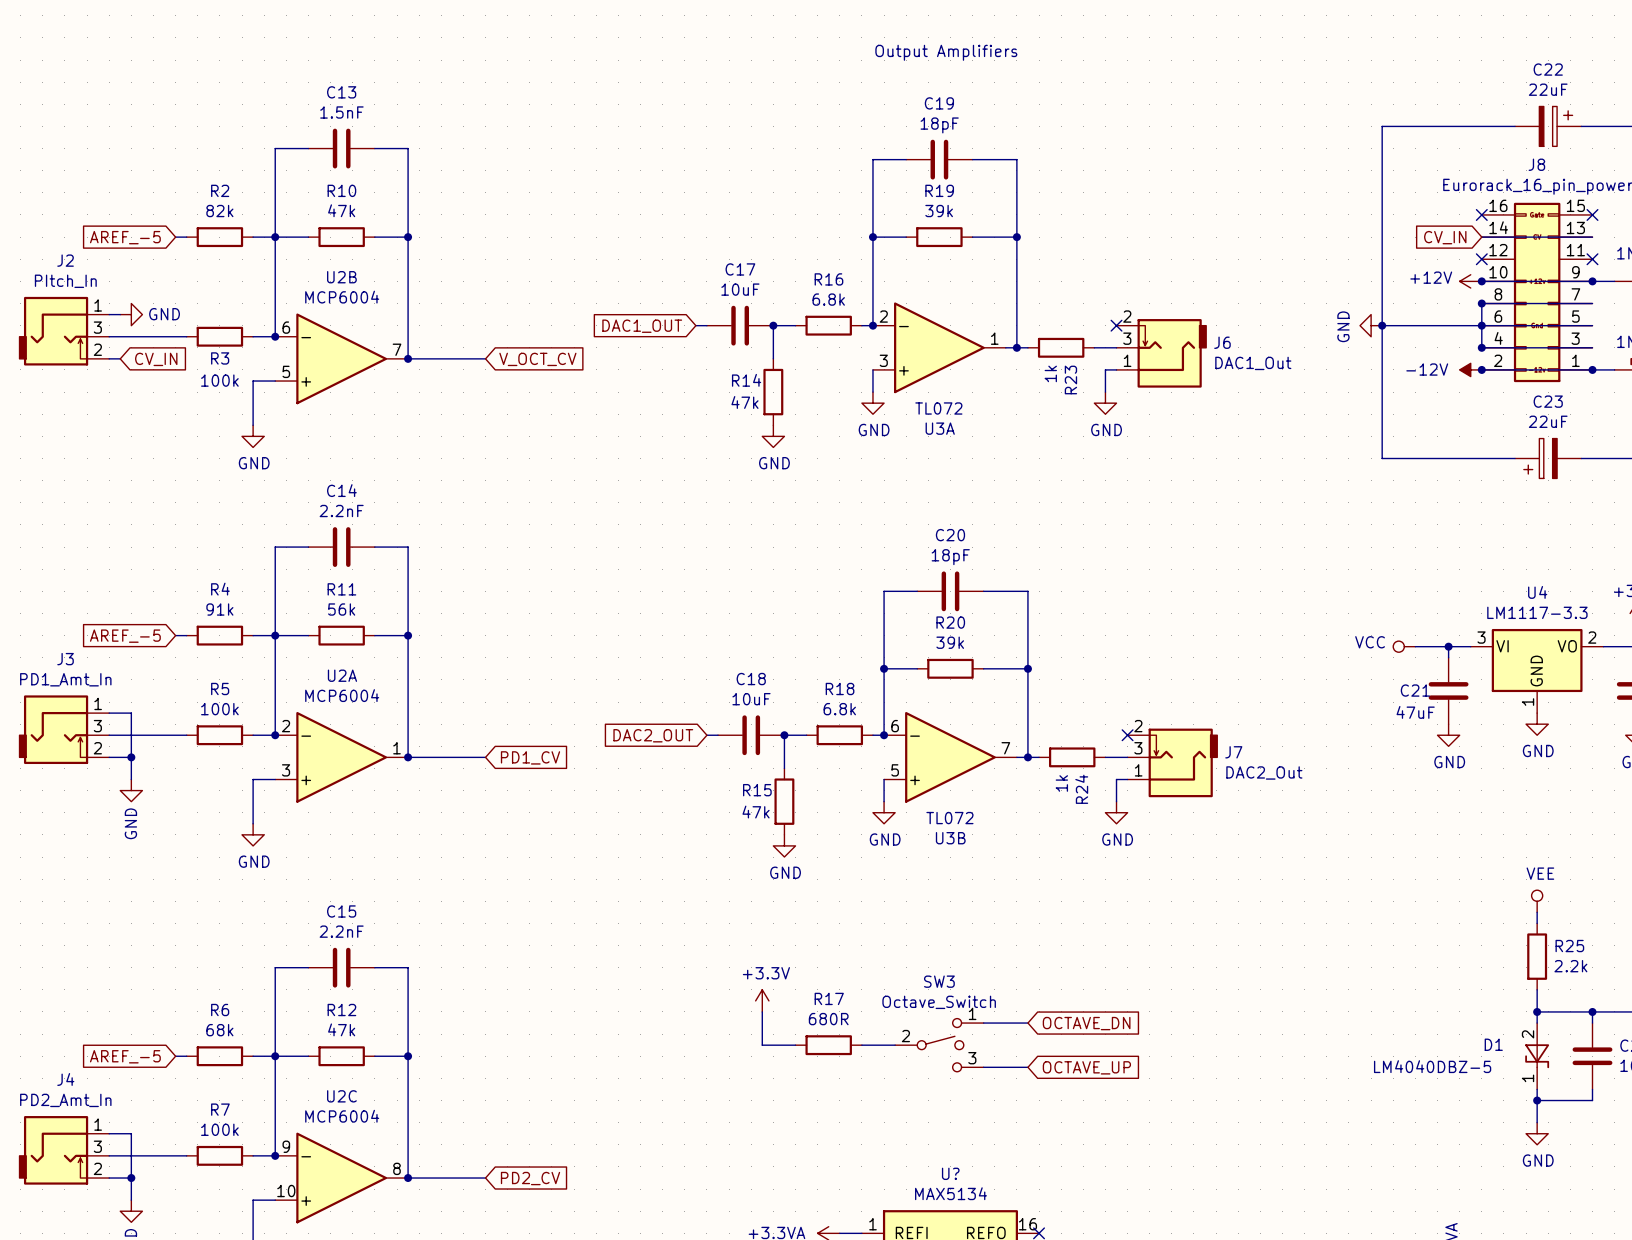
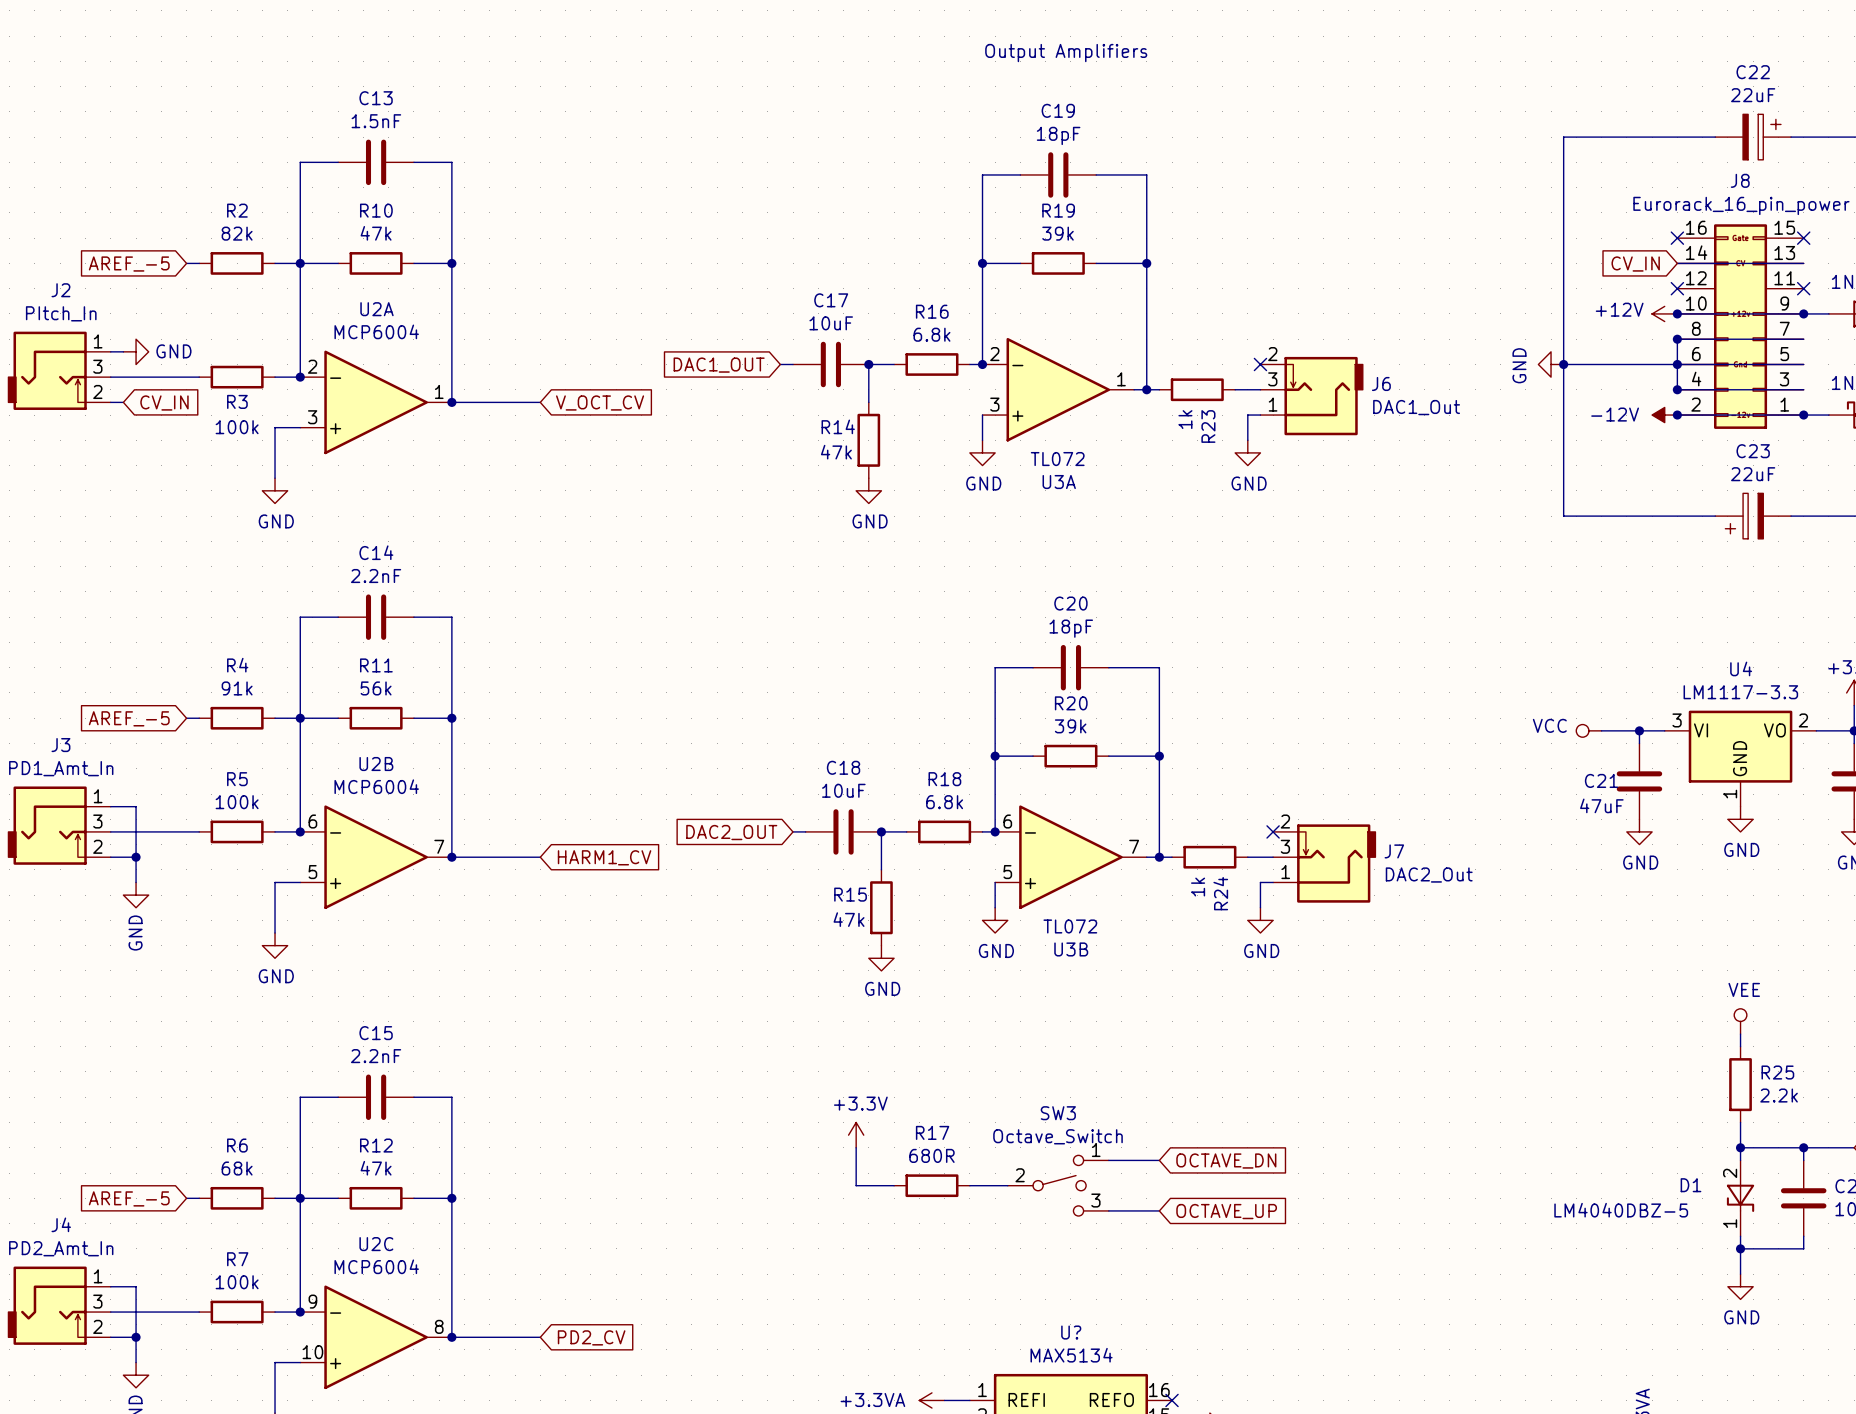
U2B position: (341, 358) -> (376, 857)
U2A position: (341, 757) -> (376, 402)
global label: PD1_CV (530, 757) -> HARM1_CV (604, 857)

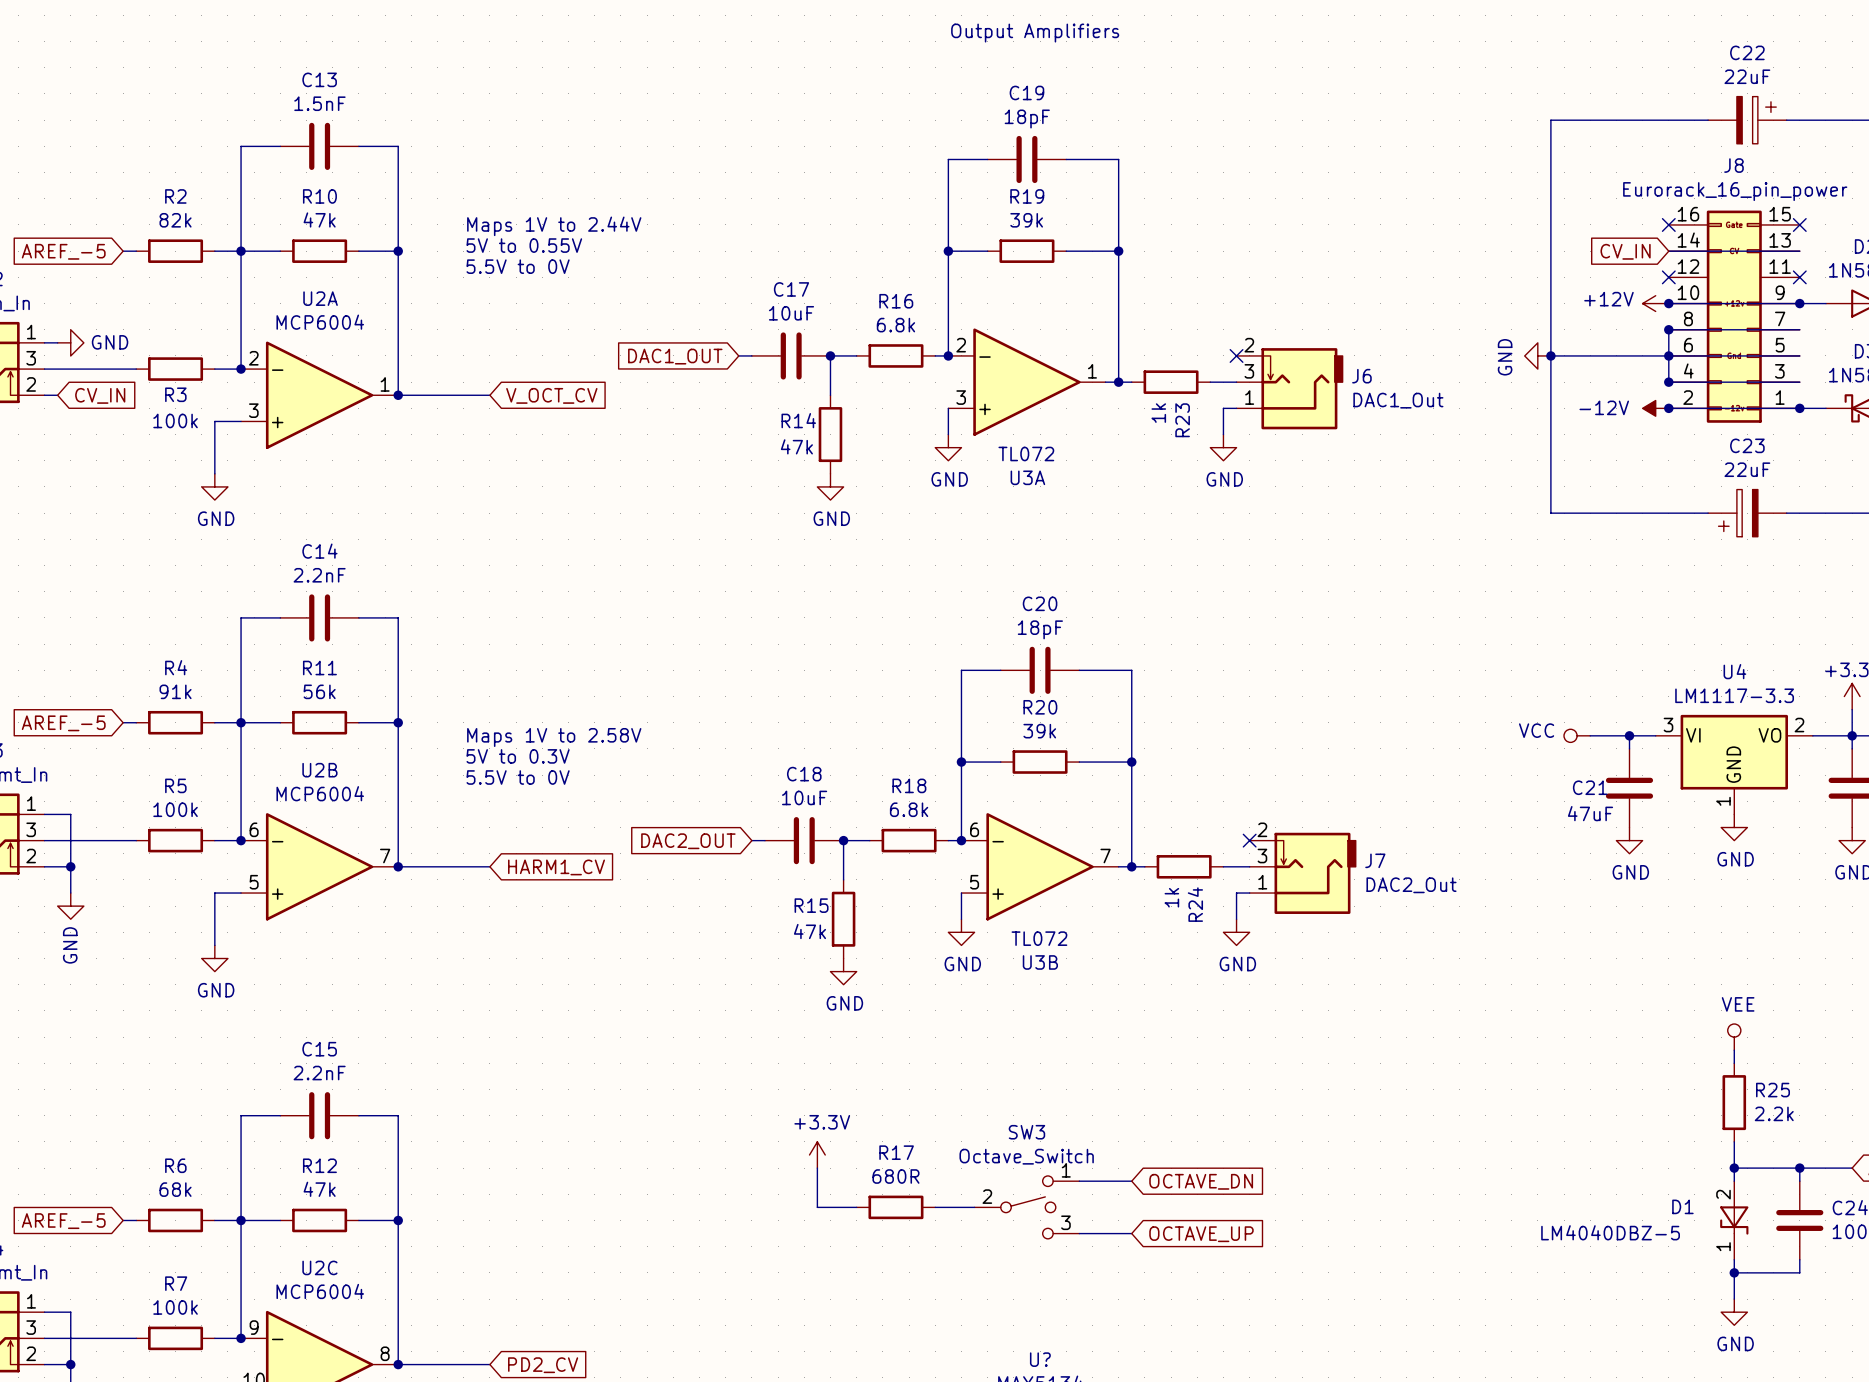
text: none -> Maps 1V to 2.44V (554, 226)
text: none -> 5V to 0.55V (524, 245)
text: none -> 5.5V to 0V (518, 266)
text: none -> Maps 1V to 2.58V (554, 737)
text: none -> 5V to 0.3V (518, 756)
text: none -> 5.5V to 0V (518, 777)

